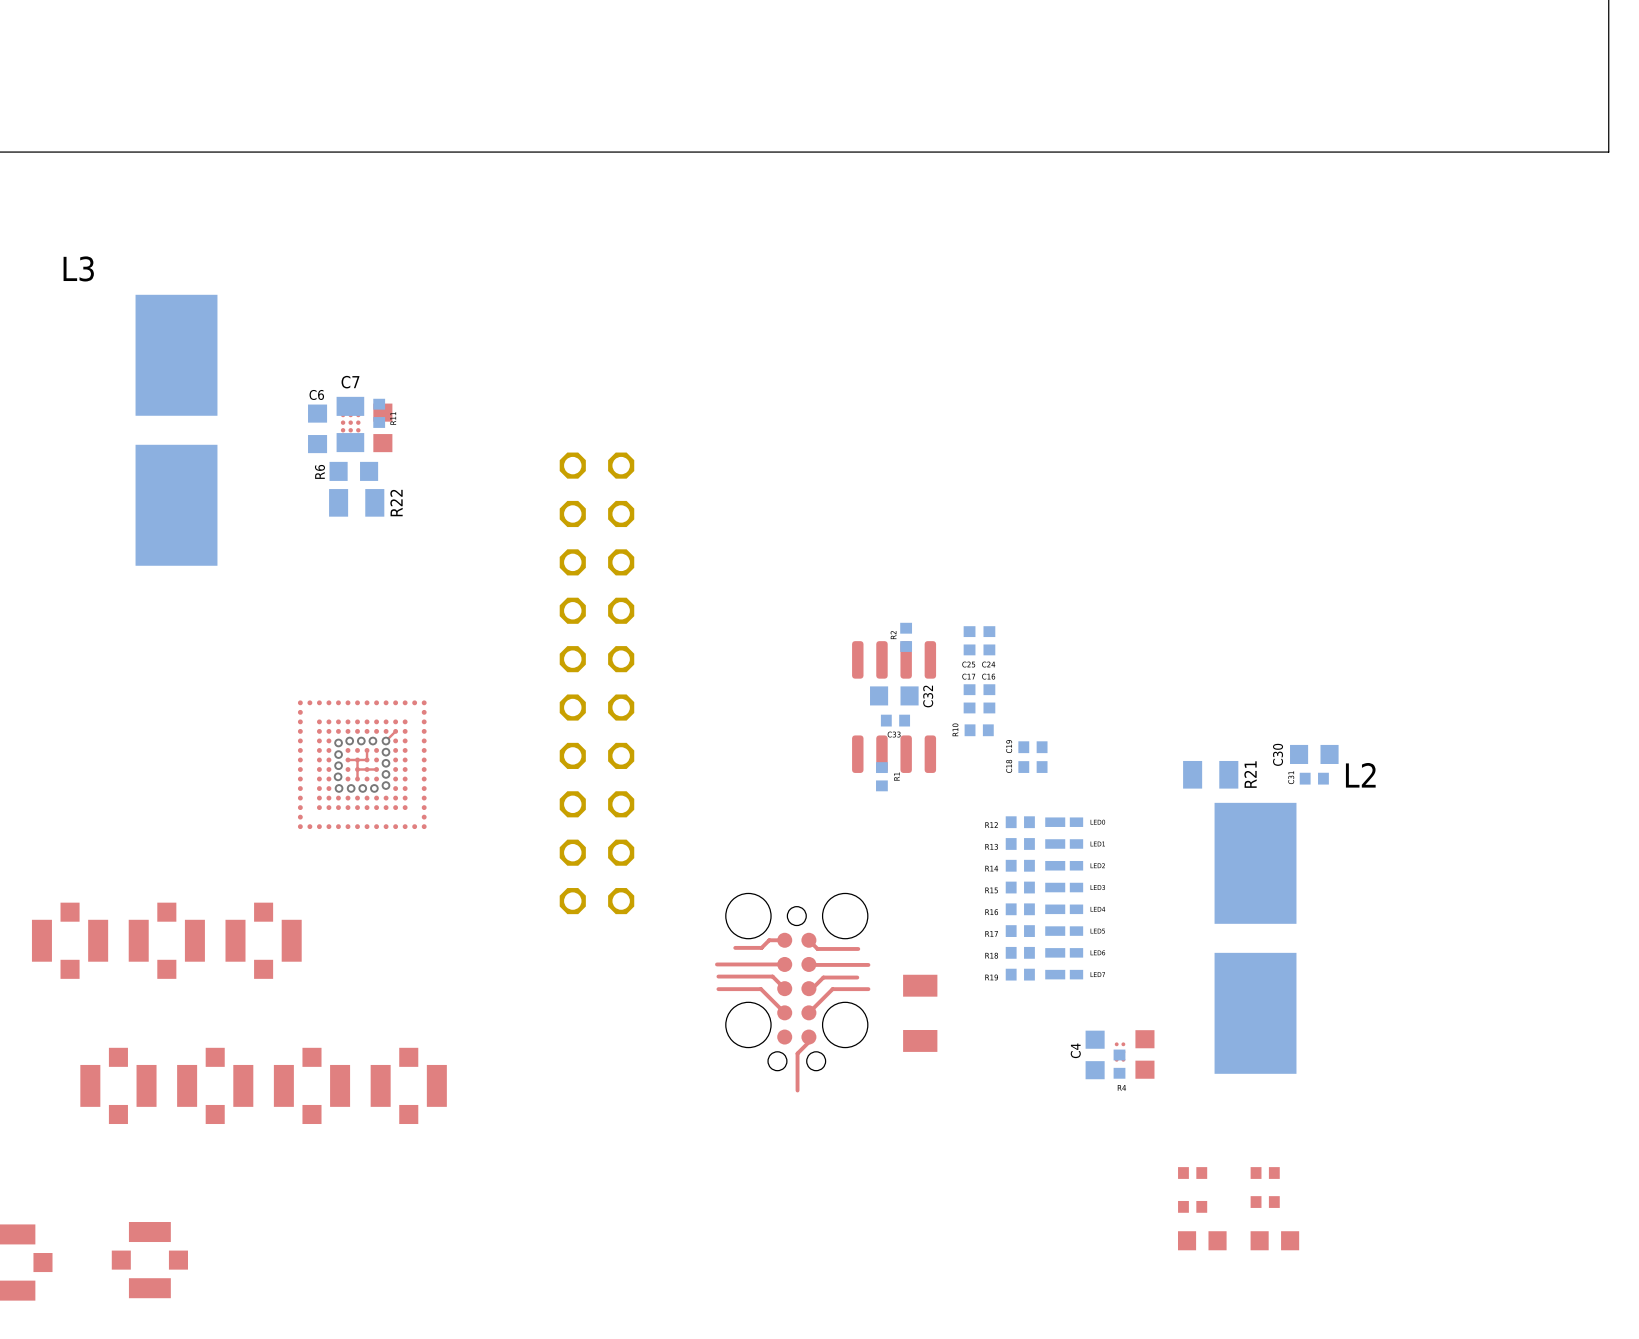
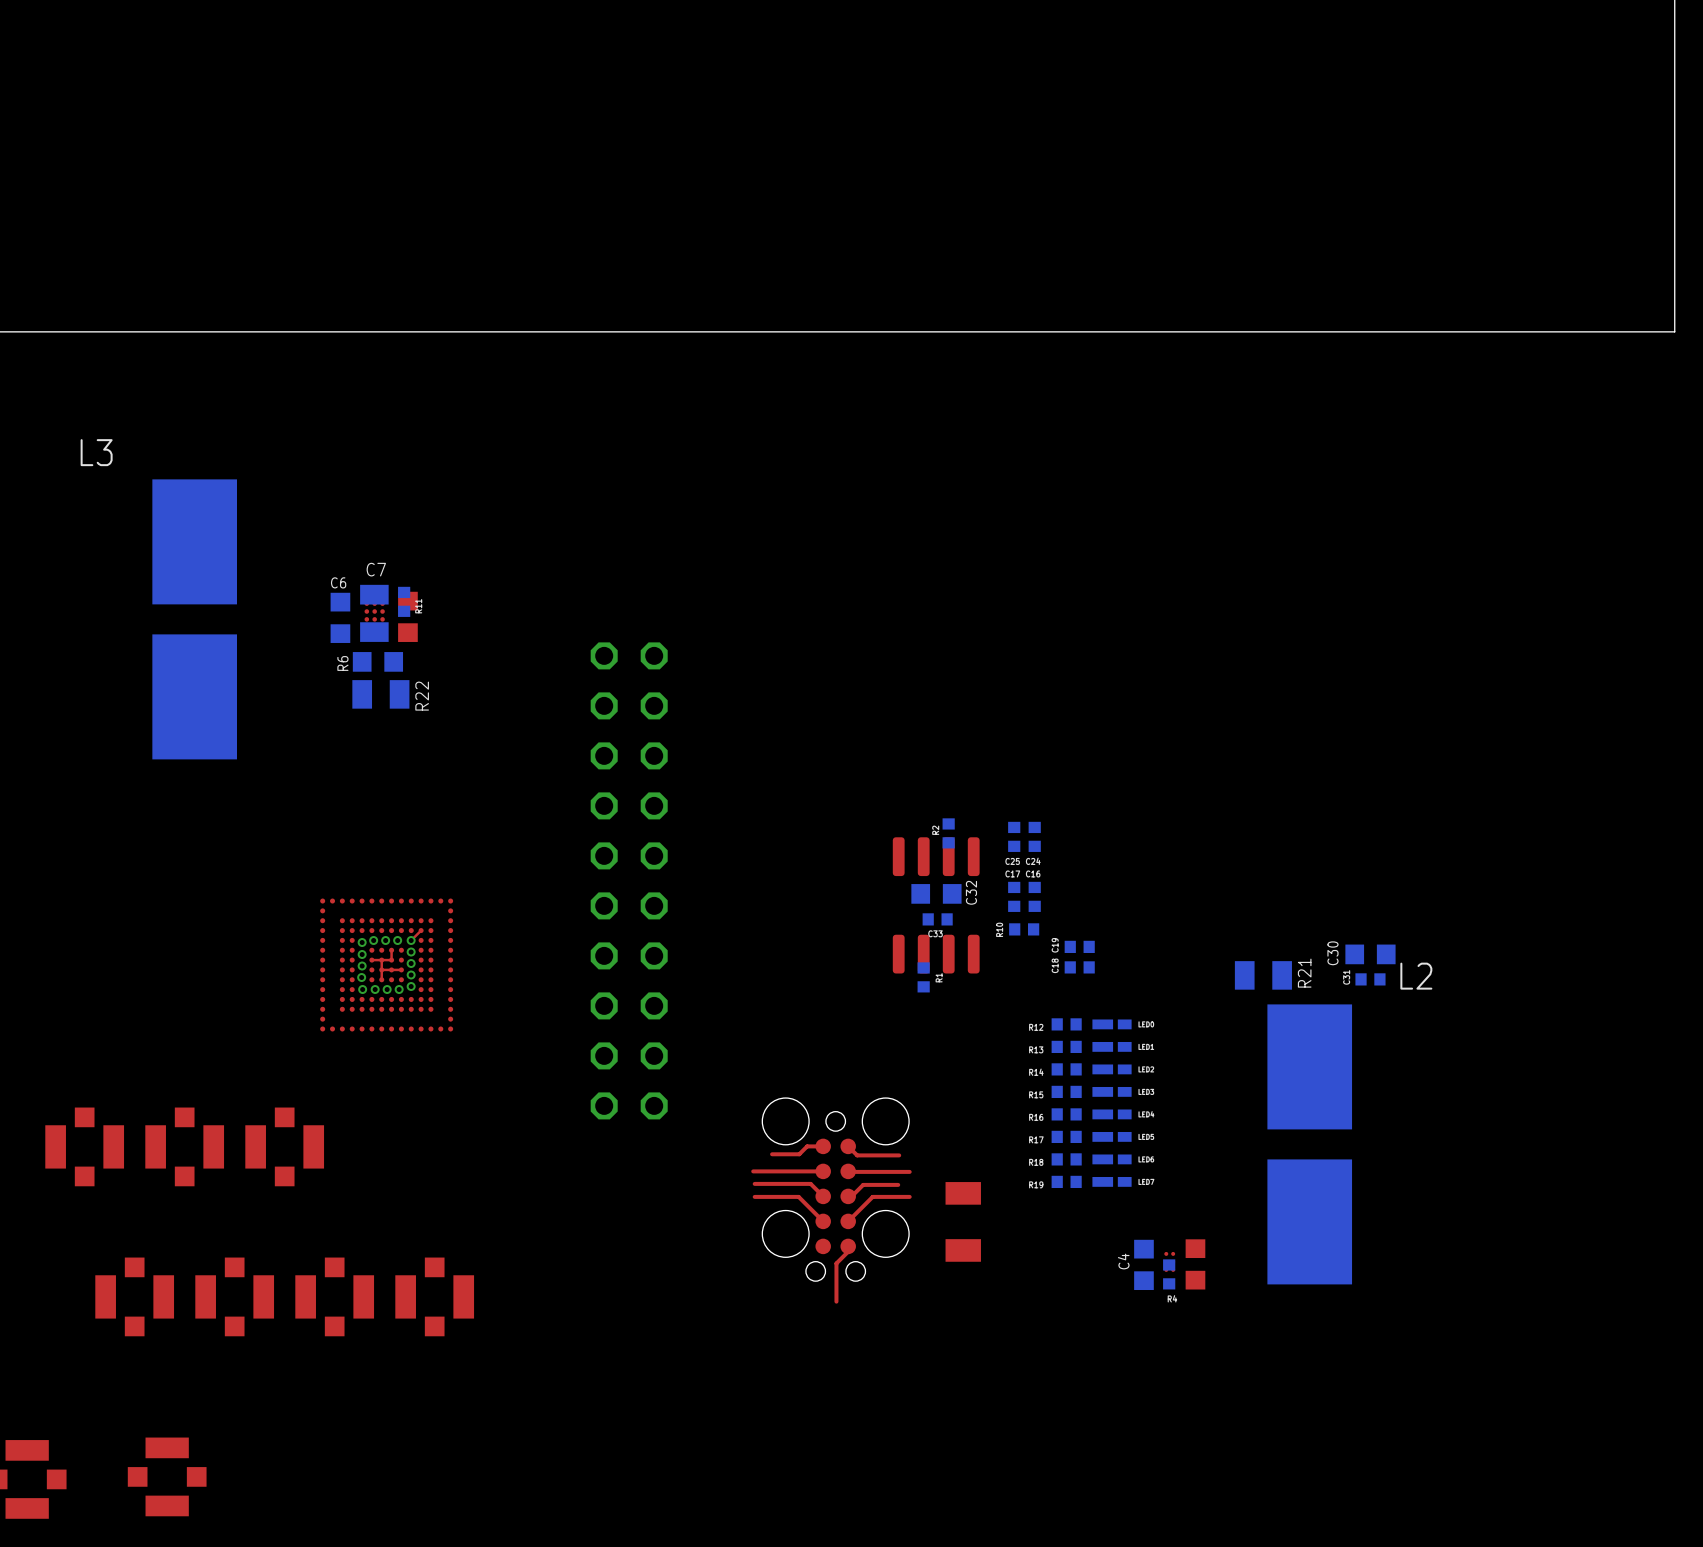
part: (1192, 1173) -> none
part: (1265, 1173) -> none
part: (1265, 1202) -> none
part: (1192, 1206) -> none
part: (1202, 1240) -> none
part: (1274, 1240) -> none

